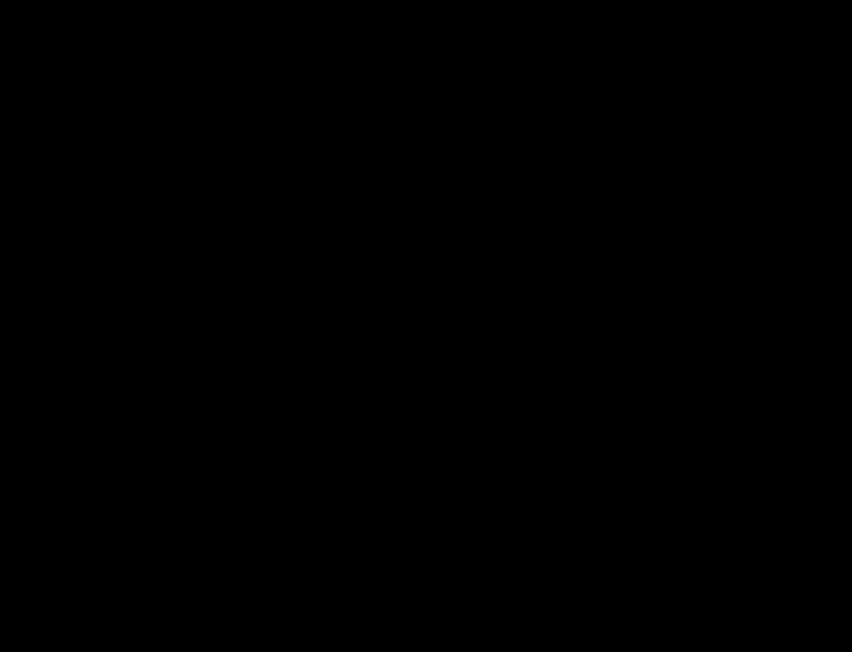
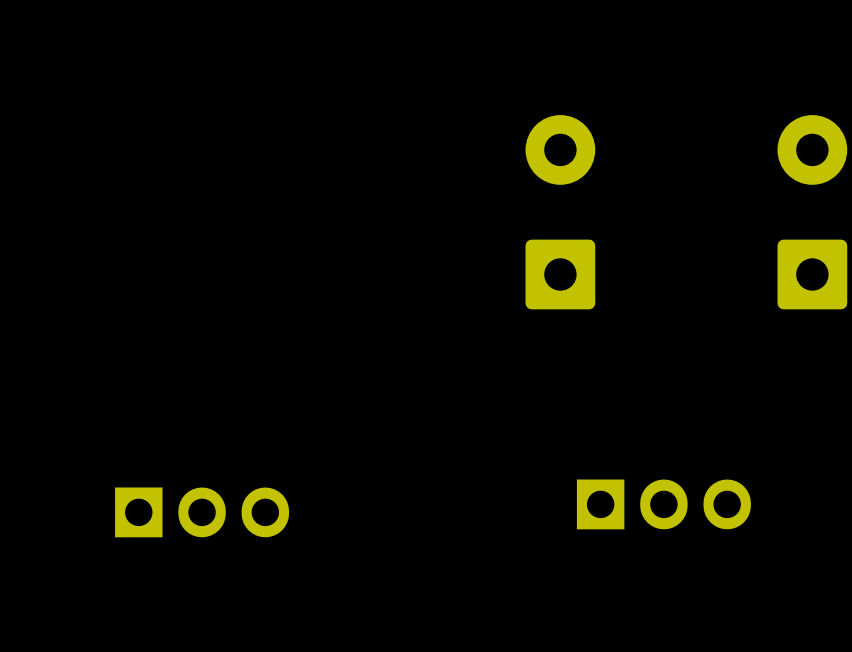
part: none -> (560, 212)
part: none -> (812, 212)
part: none -> (663, 504)
part: none -> (202, 512)

